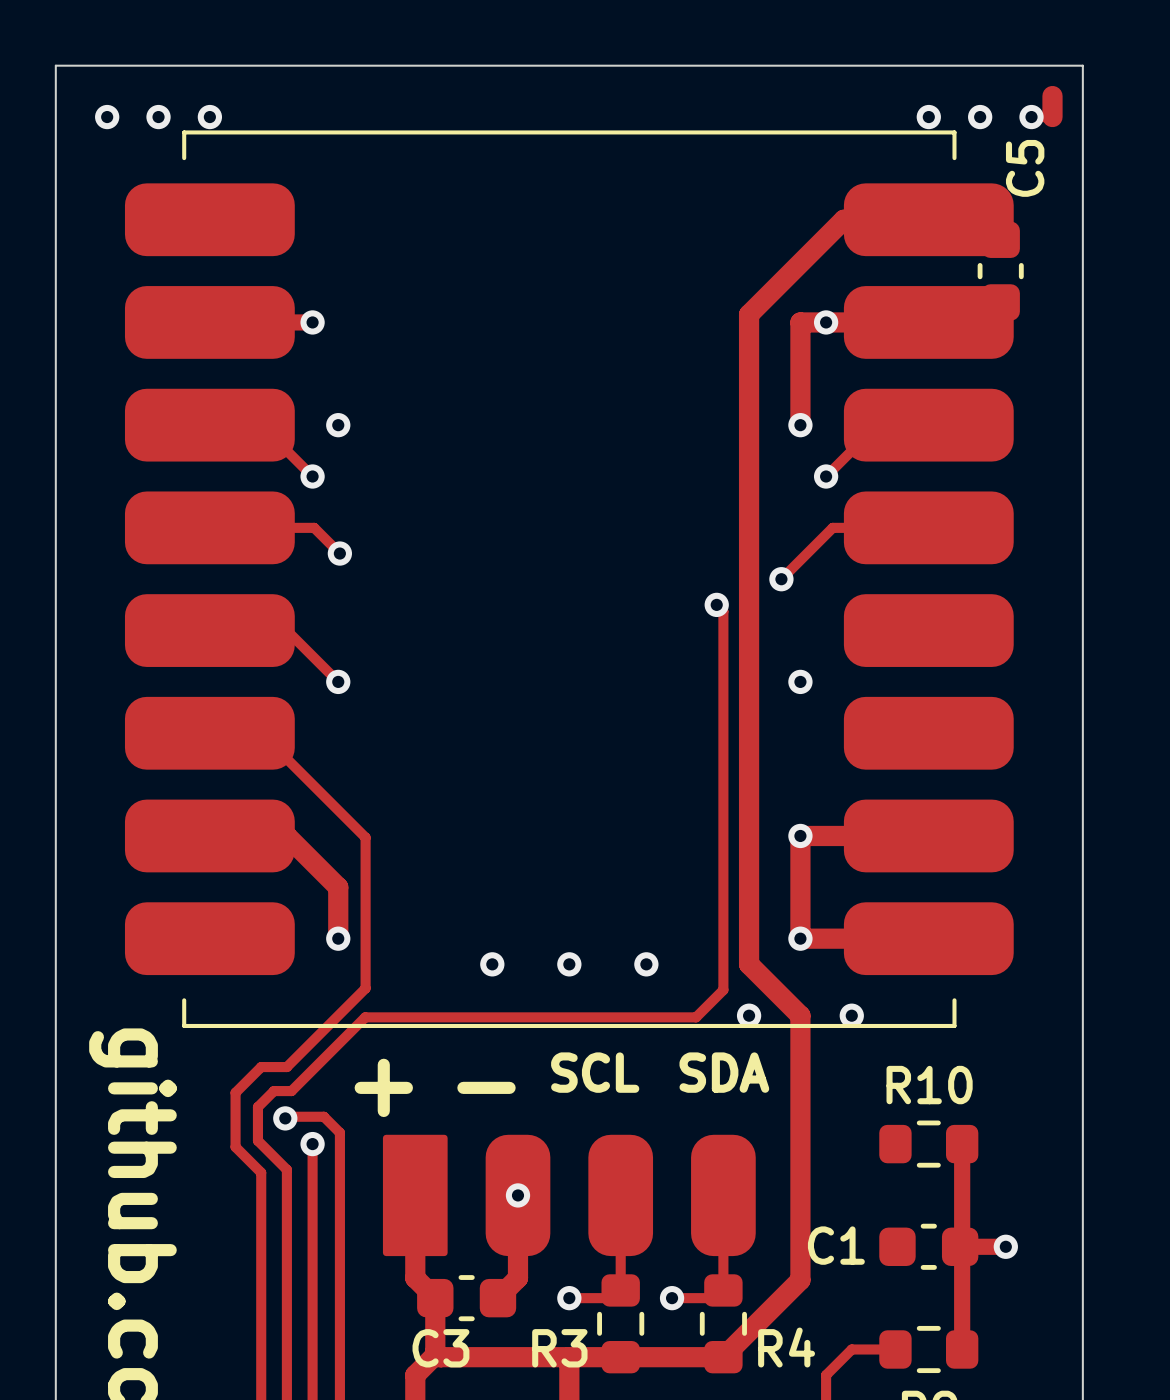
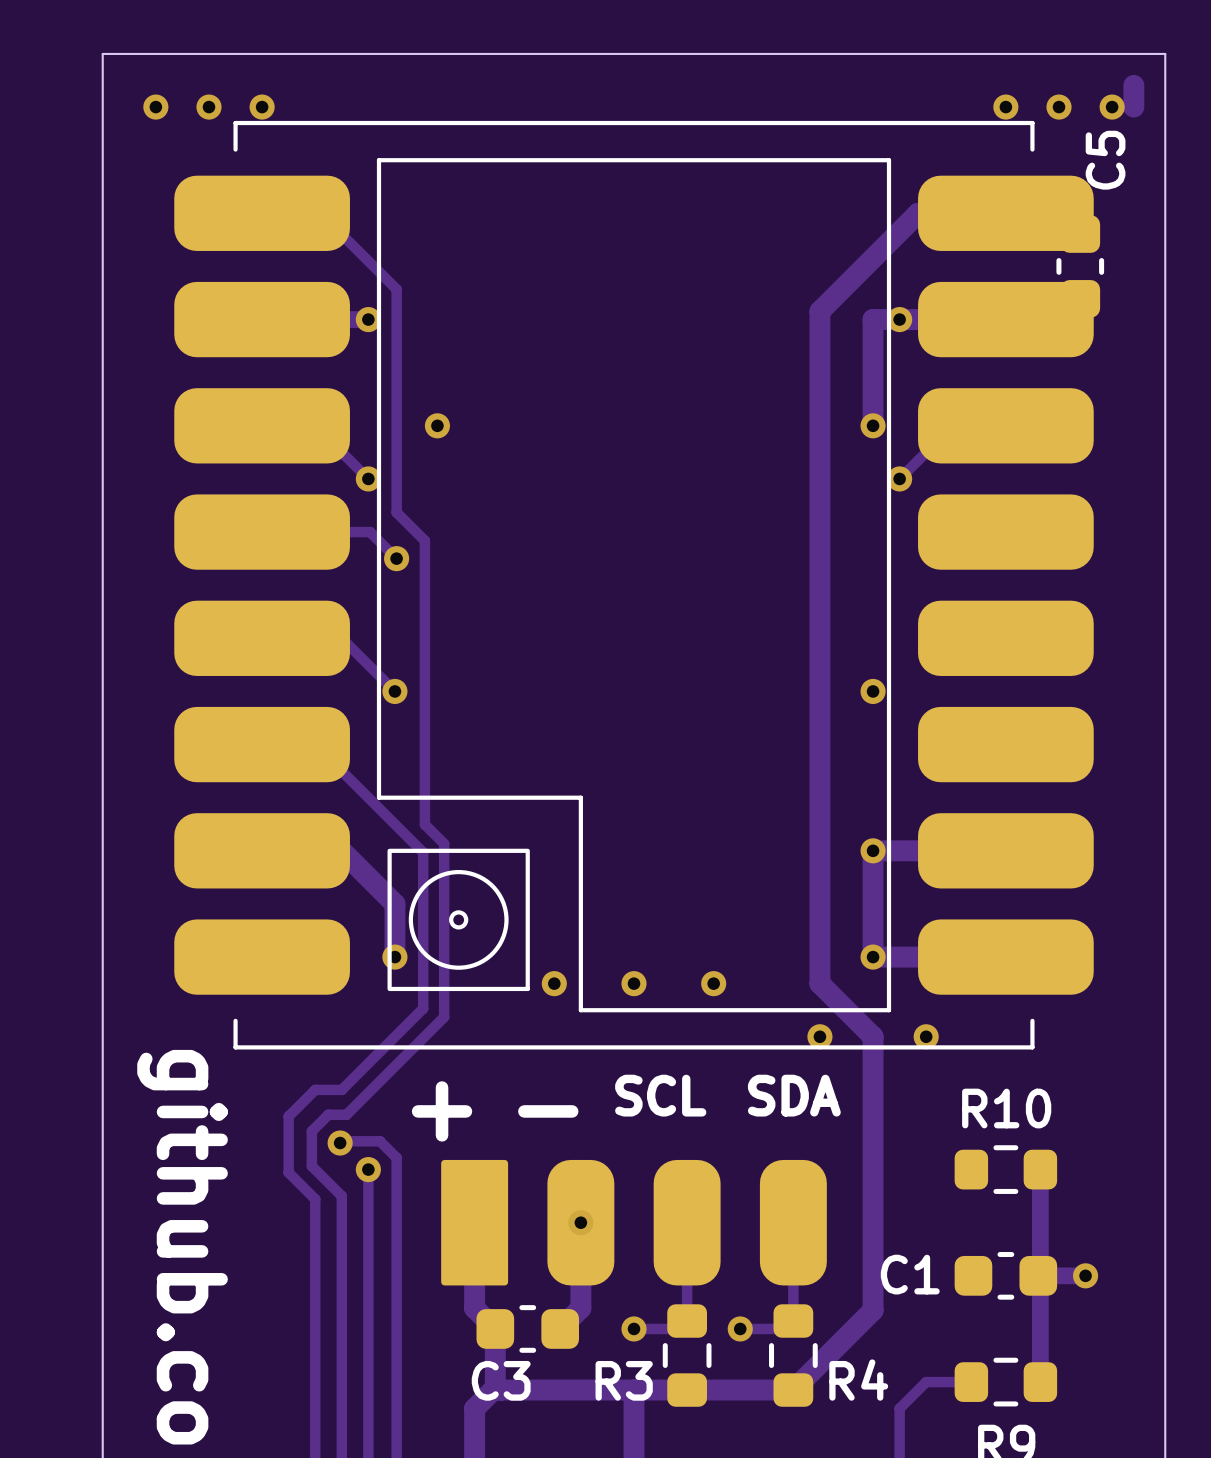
part footprint: [124, 130, 1014, 1029] -> [174, 120, 1094, 1050]
via position: (338, 425) -> (437, 425)
track: (928, 527) (832, 527) (781, 579) -> none
via: (781, 579) -> none
track: (716, 604) (723, 611) (723, 990) (696, 1017) (365, 1017) -> (262, 213) (320, 213) (396, 289) (396, 512) (424, 540) (424, 824) (444, 843) (444, 1017) (422, 1038)
via: (716, 604) -> none

